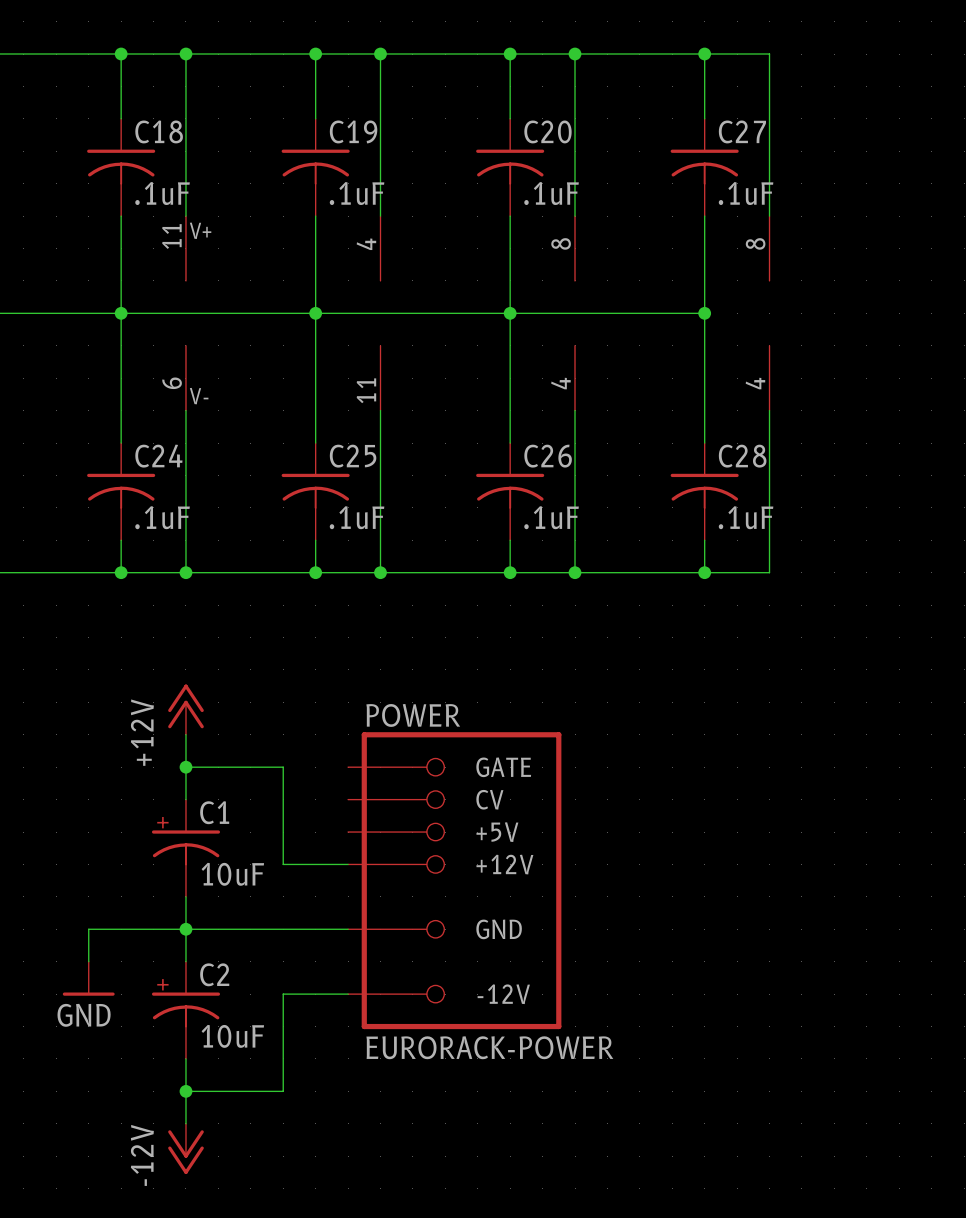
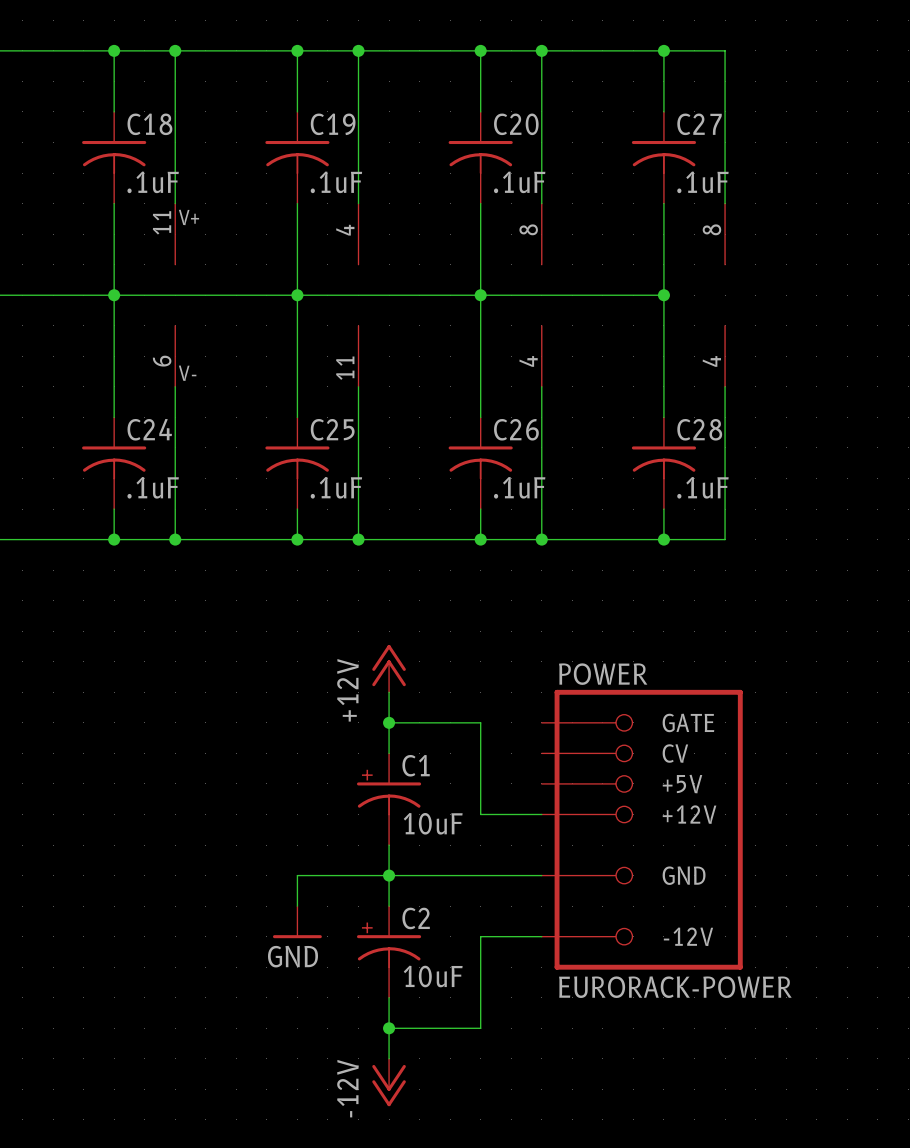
power symbol position: +12V (185, 709) -> +12V (389, 668)
wire: (185, 734) (185, 799) -> (389, 692) (389, 753)
wire: (185, 767) (283, 767) (283, 864) (348, 864) -> (389, 722) (480, 722) (480, 814) (541, 814)
junction: (185, 767) -> none
junction: none -> (389, 722)
C1 position: (185, 848) -> (389, 799)
POWER position: (454, 880) -> (642, 829)
wire: (185, 896) (185, 961) -> (389, 845) (389, 906)
junction: (185, 929) -> none
wire: (315, 929) (88, 929) (88, 961) -> (297, 875) (297, 906)
wire: none -> (327, 875) (541, 875)
junction: none -> (389, 875)
power symbol position: GND (88, 978) -> GND (297, 922)
wire: (348, 994) (283, 994) (283, 1091) (185, 1091) -> (541, 936) (480, 936) (480, 1028) (389, 1028)
C2 position: (185, 1010) -> (389, 951)
wire: (185, 1058) (185, 1123) -> (389, 997) (389, 1058)
junction: (185, 1091) -> none
junction: none -> (389, 1028)
power symbol position: -12V (185, 1148) -> -12V (389, 1082)

